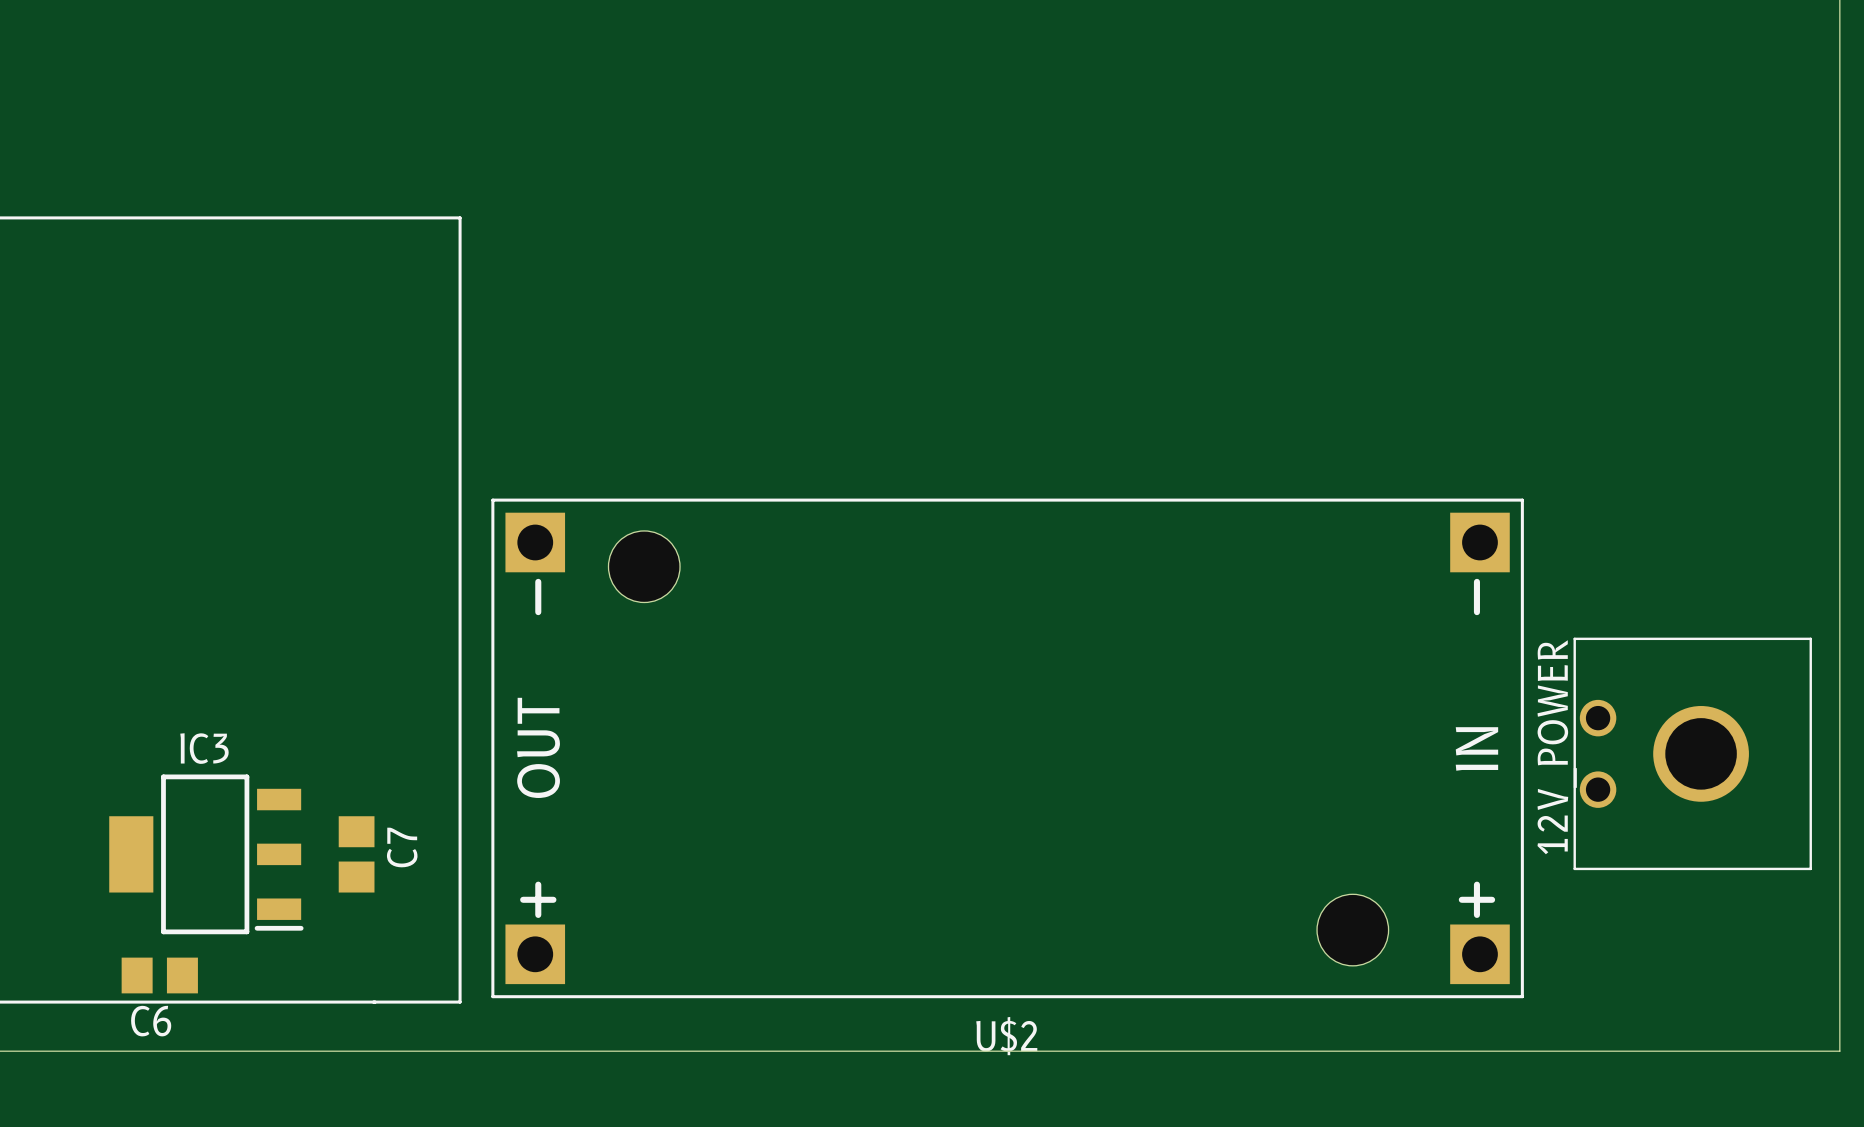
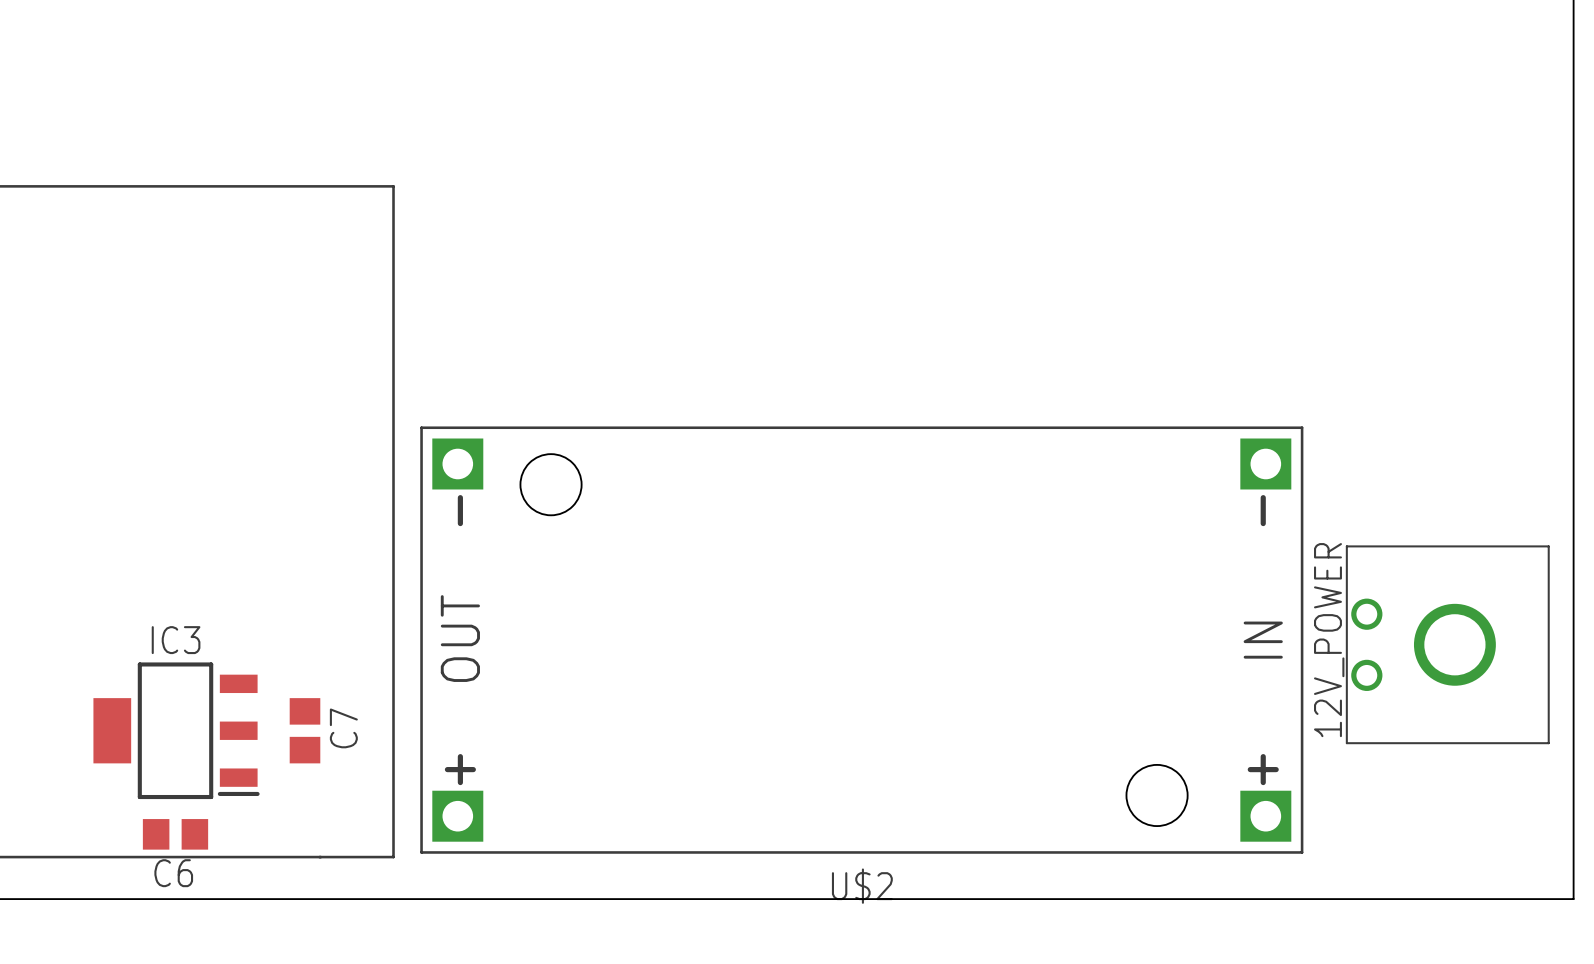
C6 position: (159, 975) -> (175, 834)

